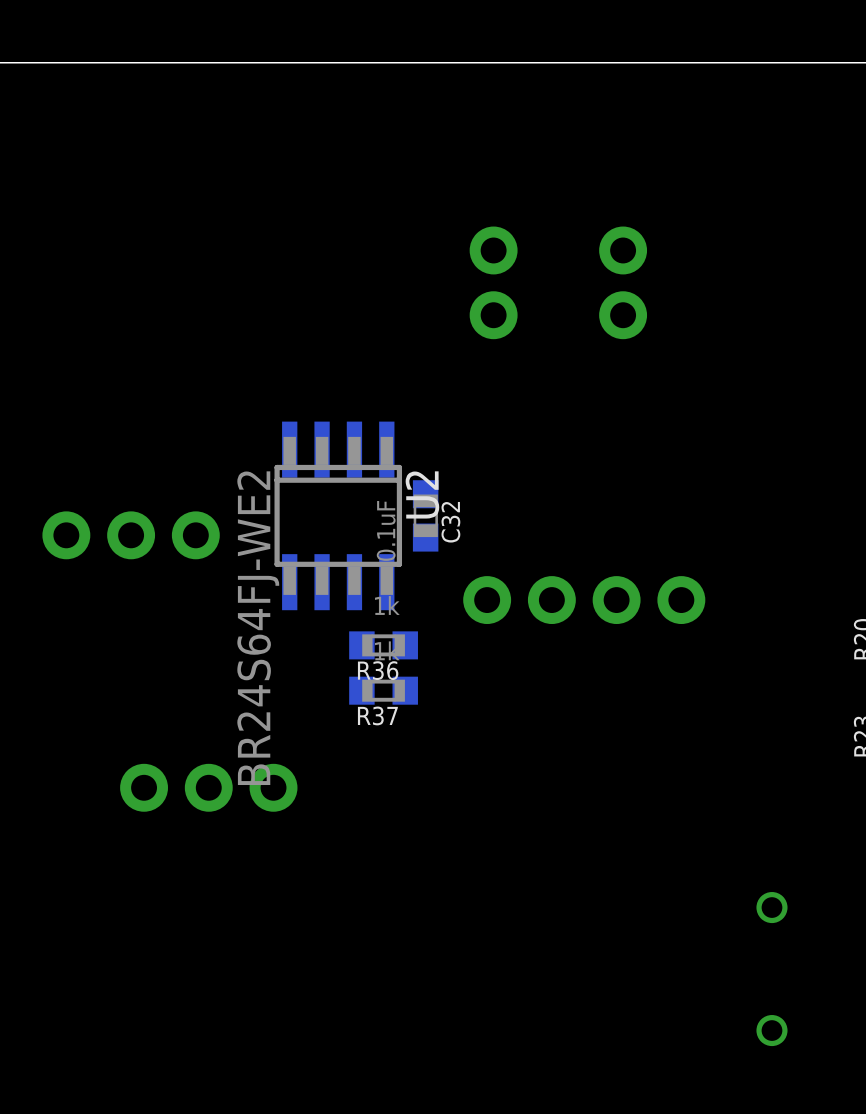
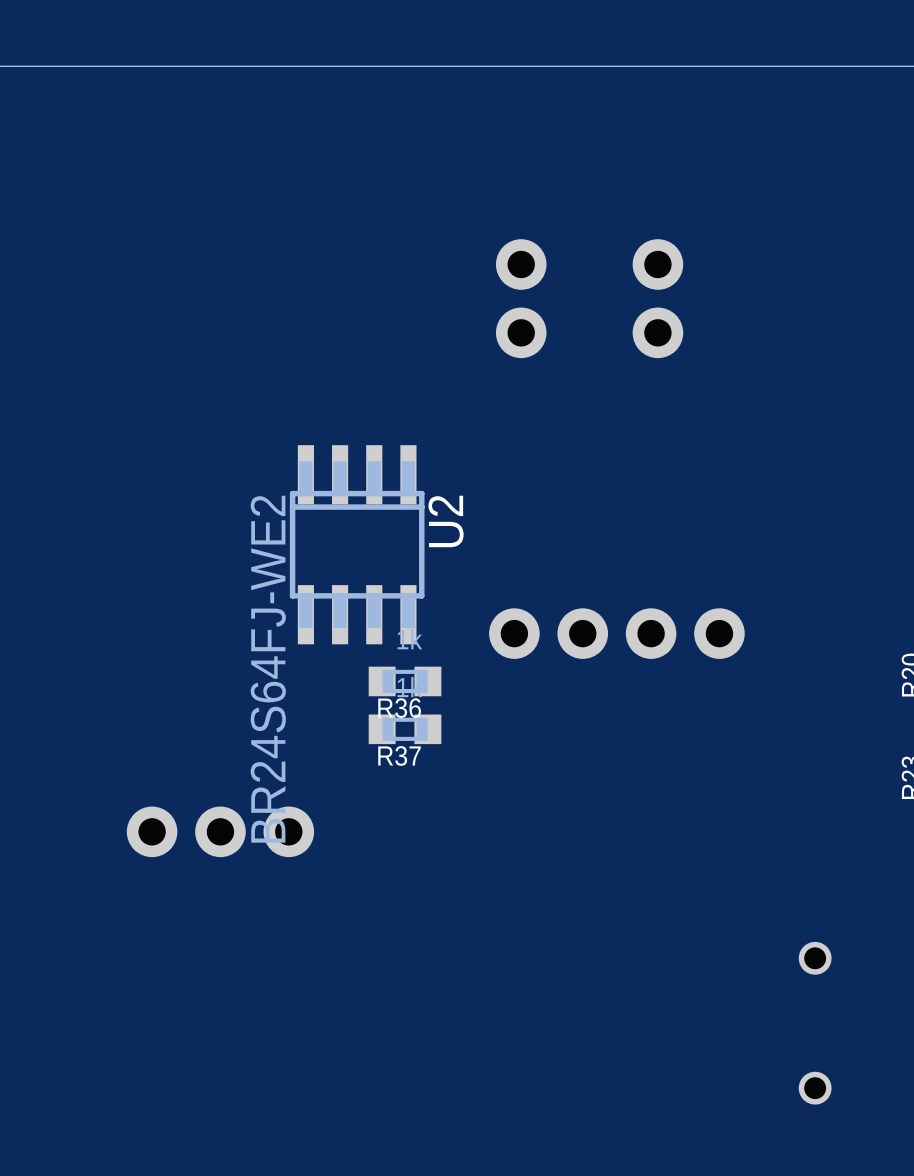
C32: 0.1uF (425, 515) -> none
part: (131, 535) -> none

